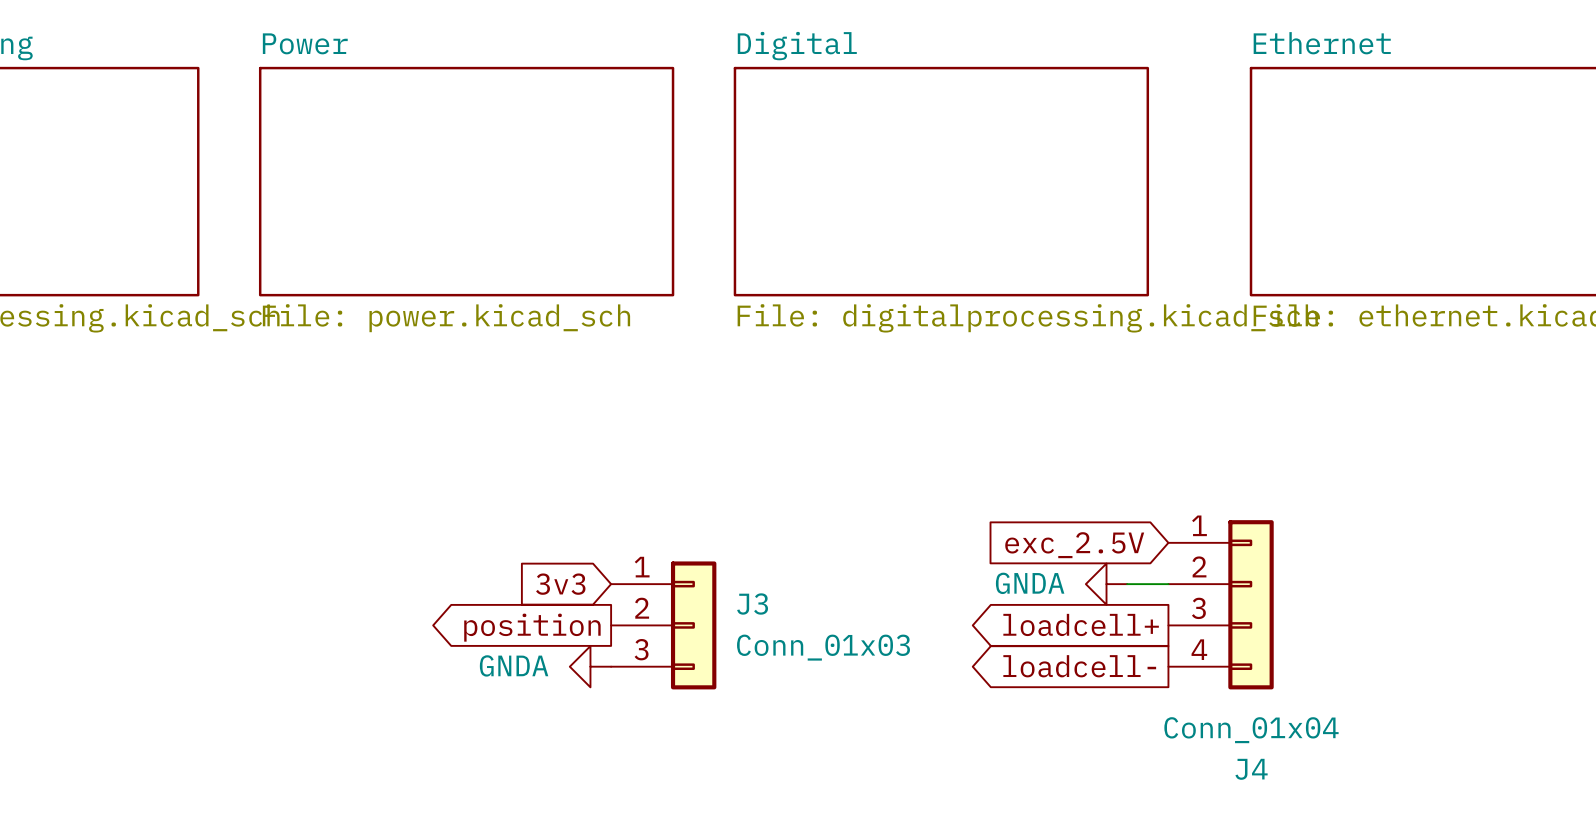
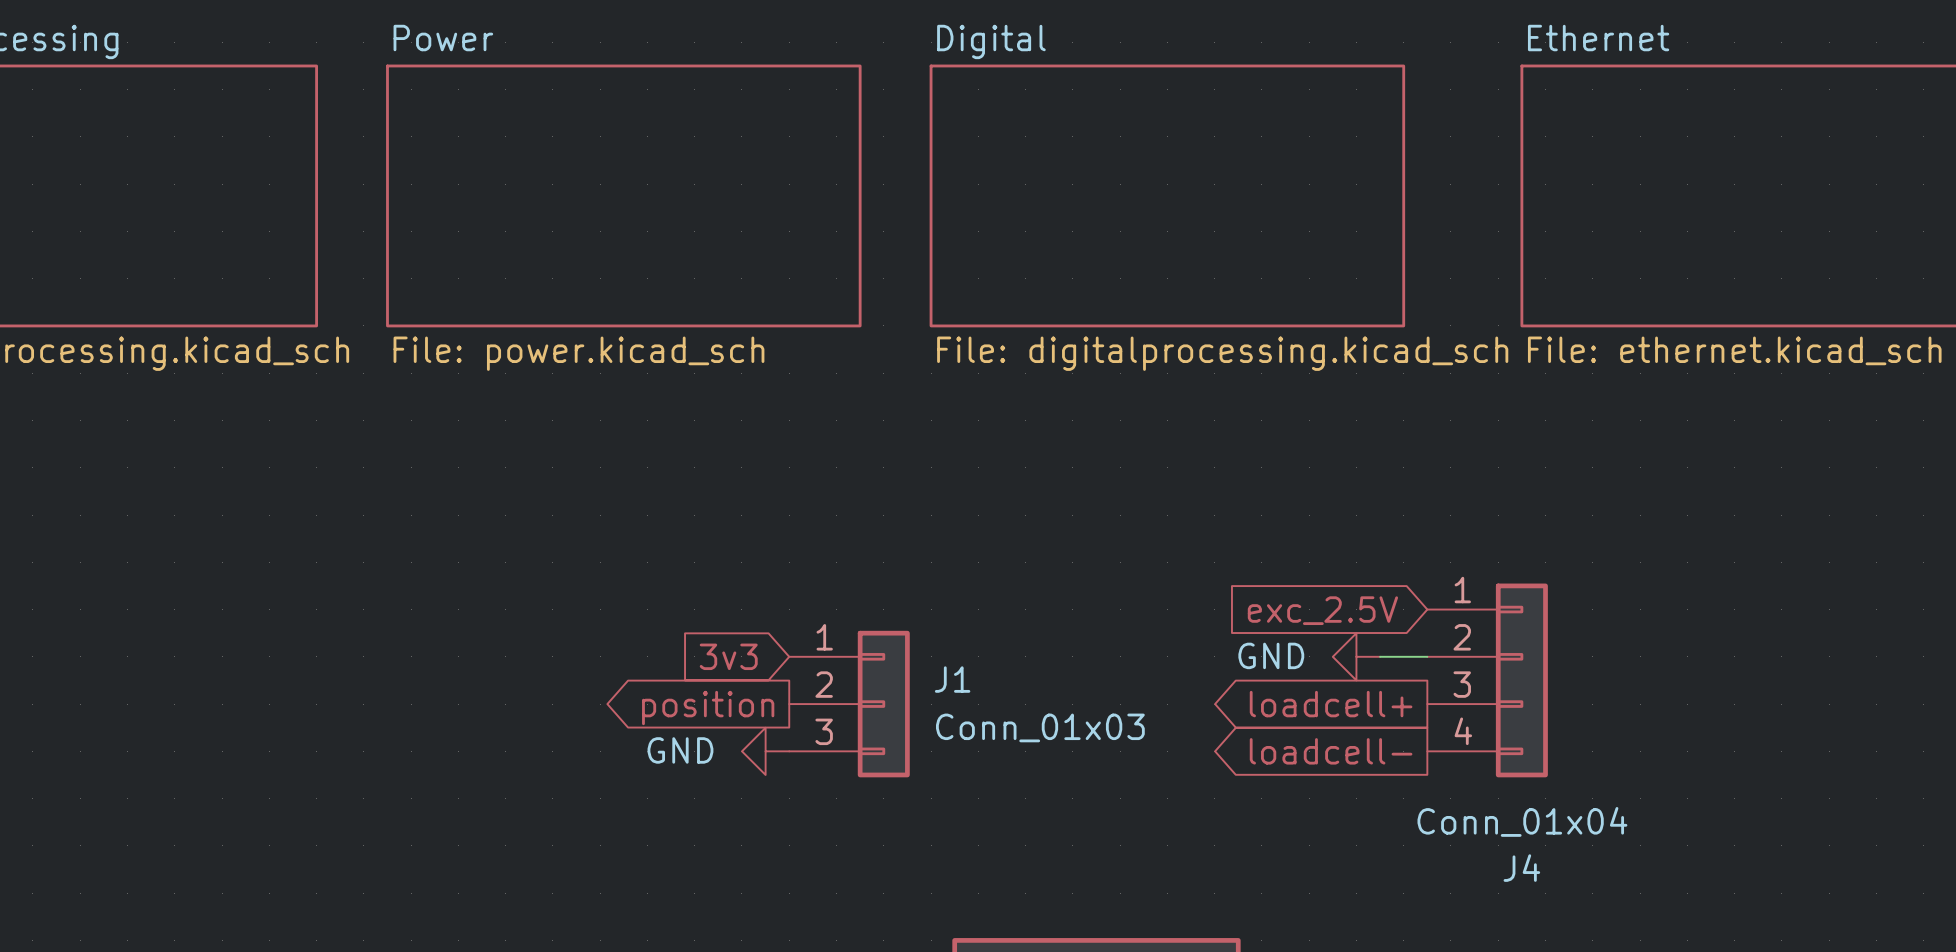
power symbol: GNDA (1106, 584) -> GND (1356, 656)
J3 name: J3 (752, 604) -> J1 (952, 679)
power symbol: GNDA (590, 666) -> GND (765, 751)

